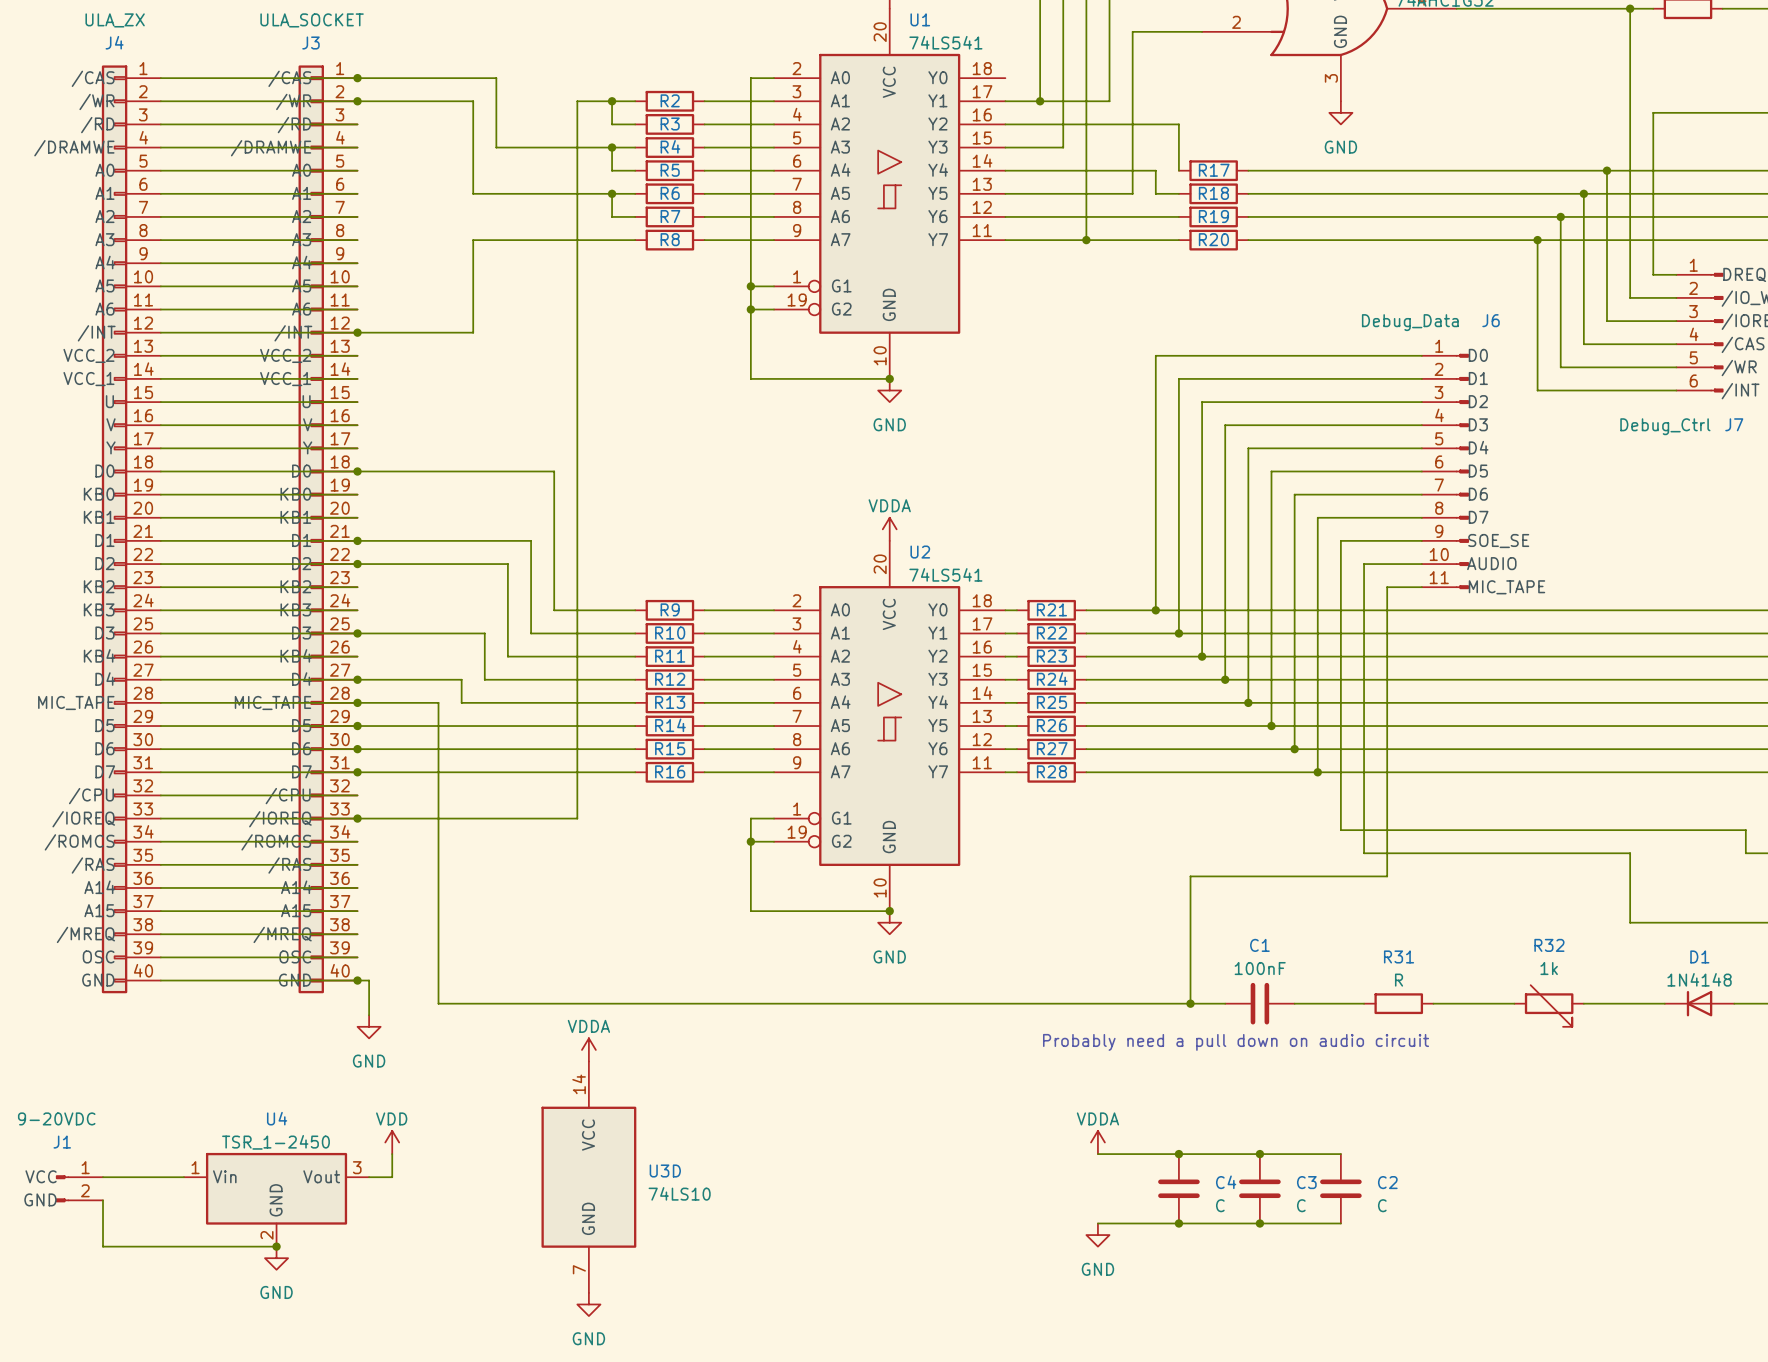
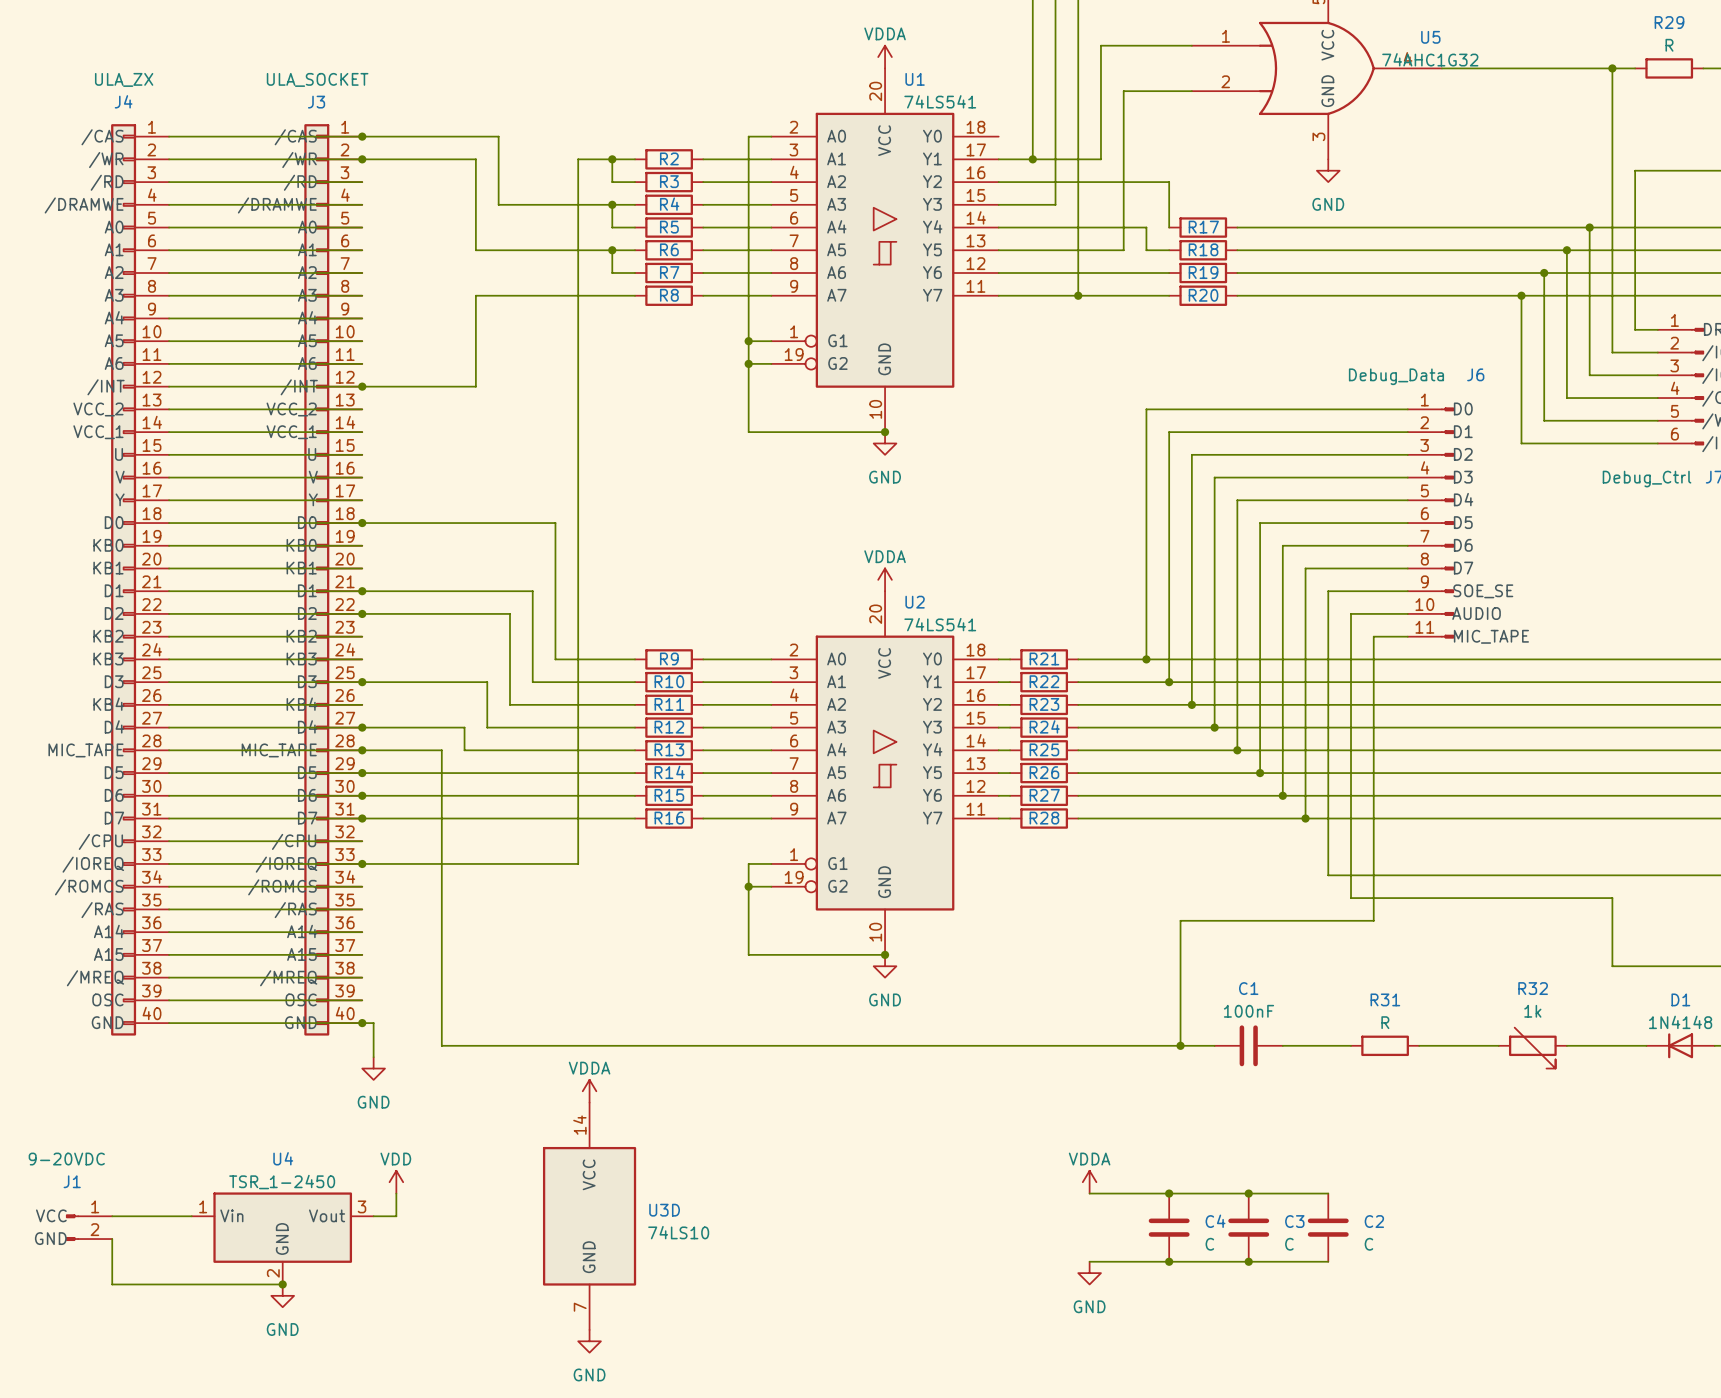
text: Probably need a pull down on audio circuit (1236, 1042) -> none

